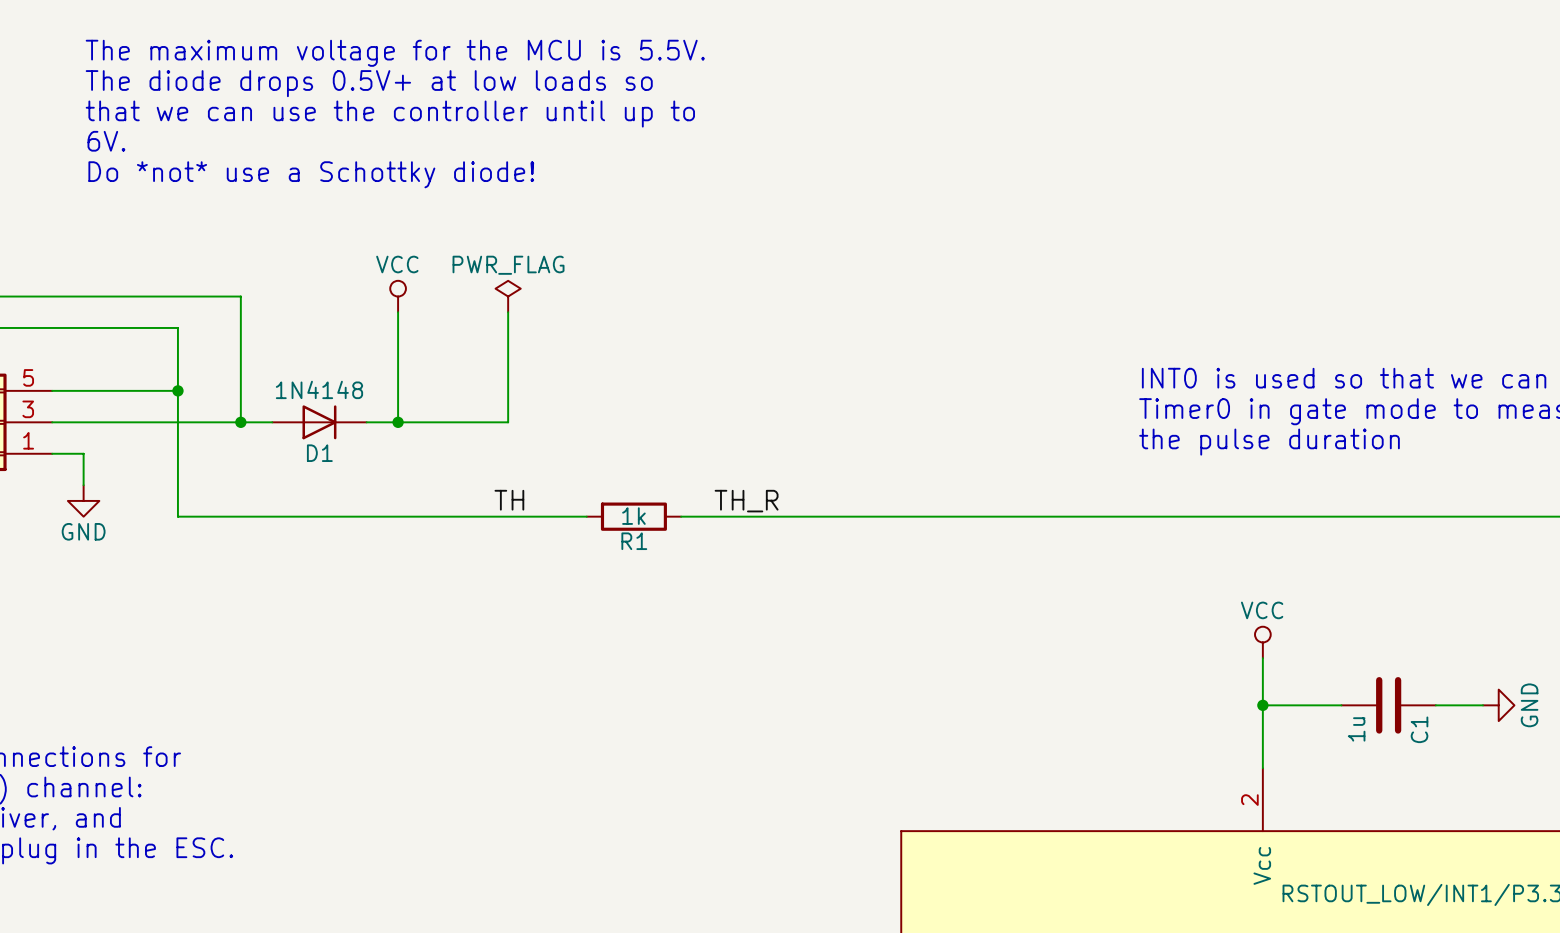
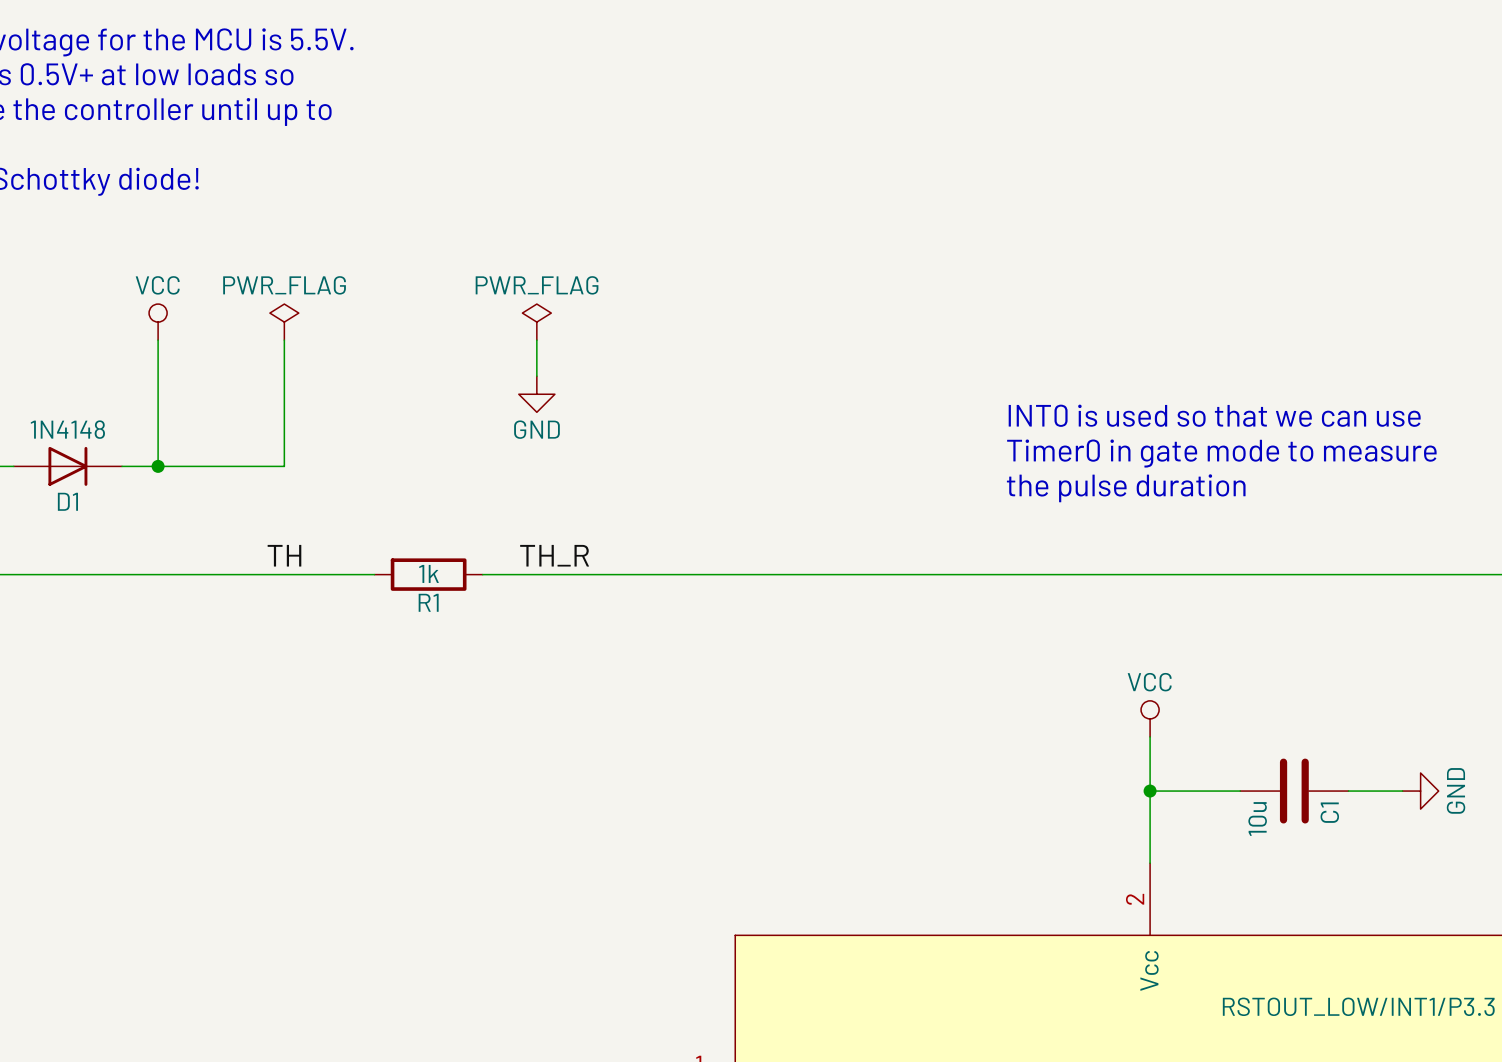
power symbol: none -> PWR_FLAG (536, 322)
wire: none -> (536, 340) (536, 376)
power symbol: none -> GND (536, 394)
C1 value: 1u (1356, 729) -> 10u (1257, 819)

